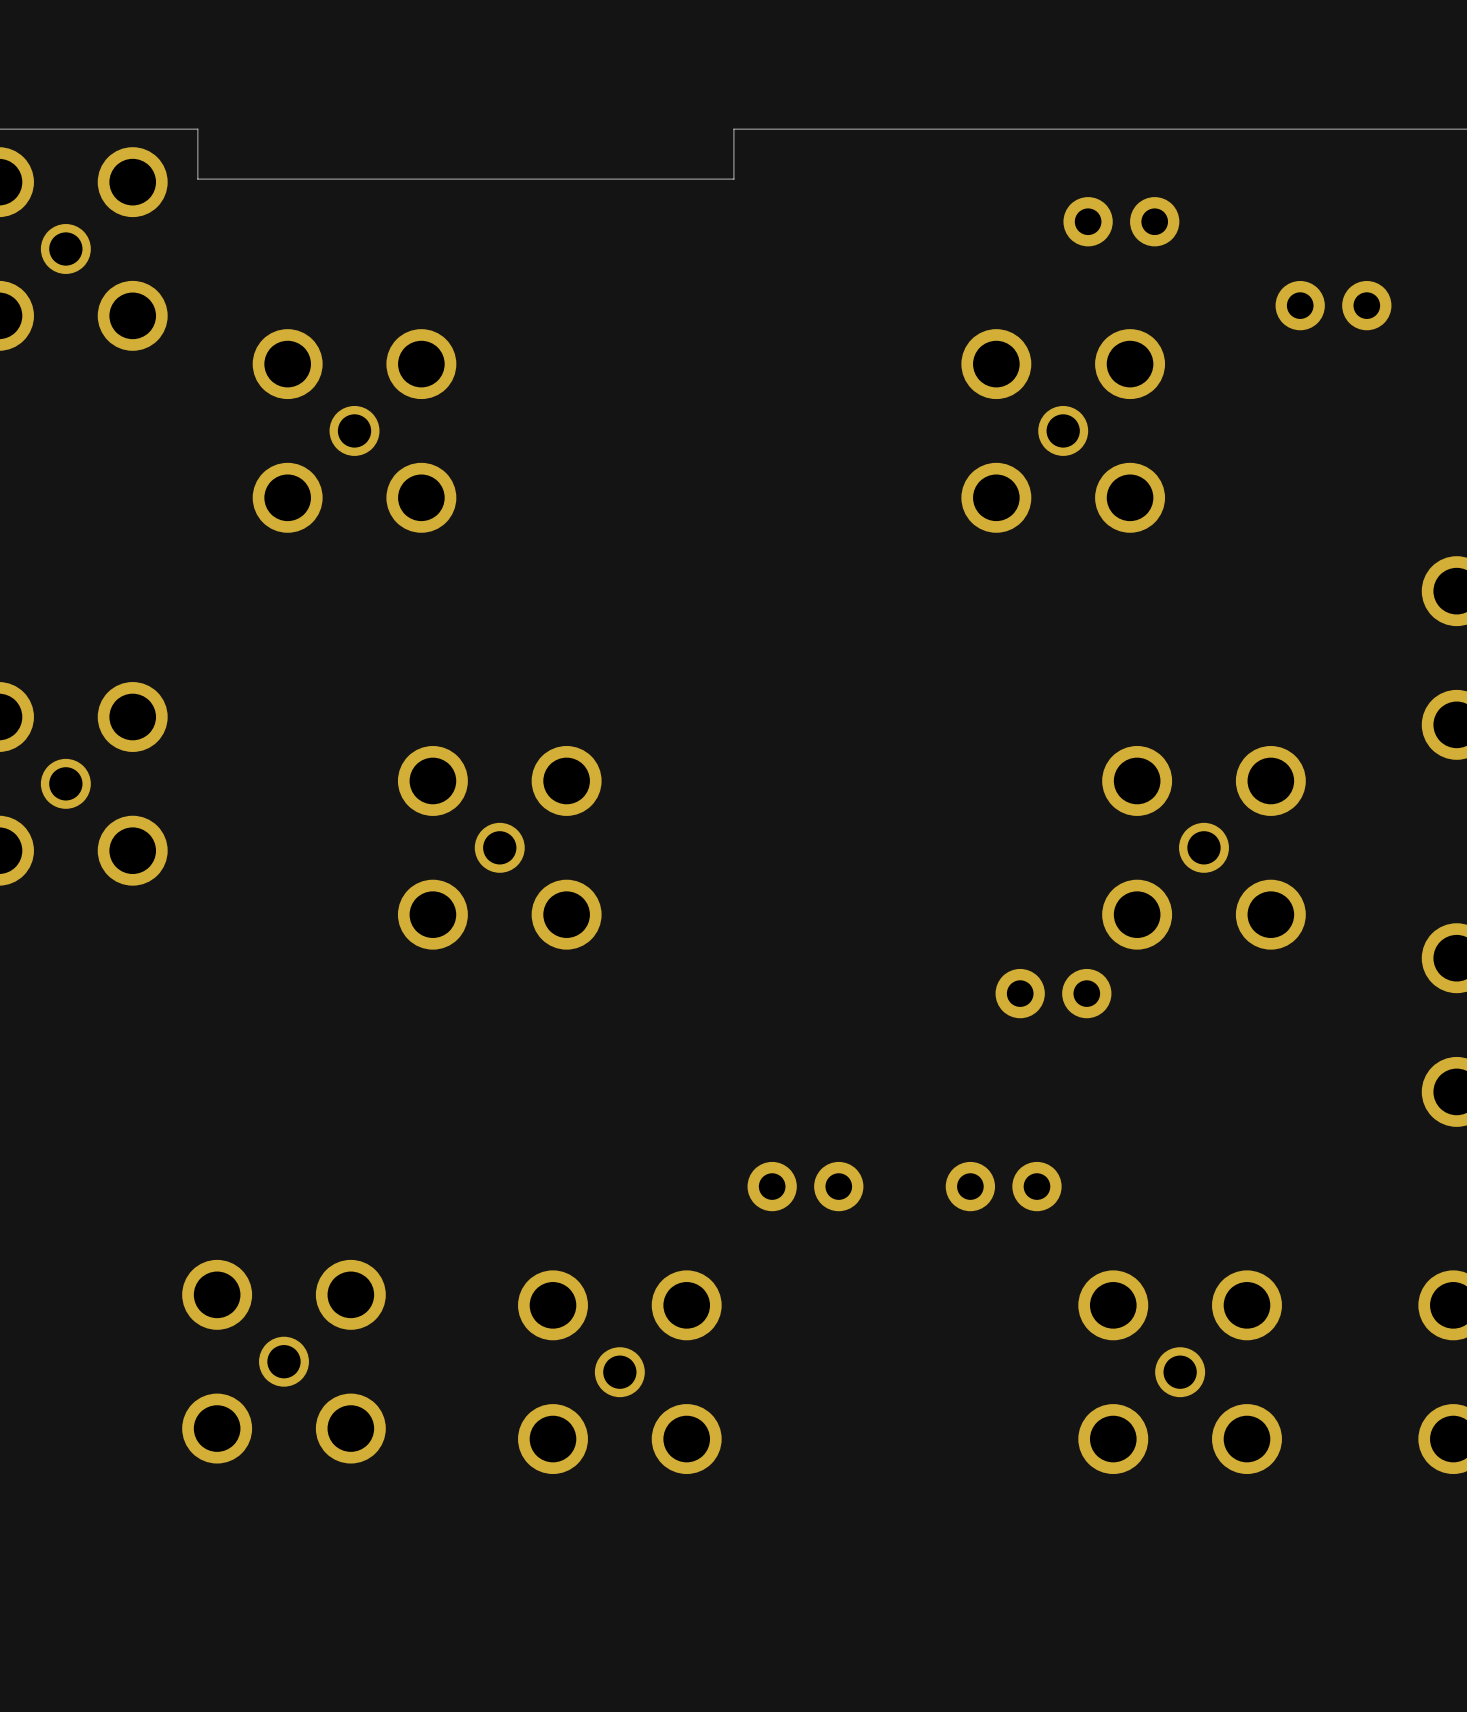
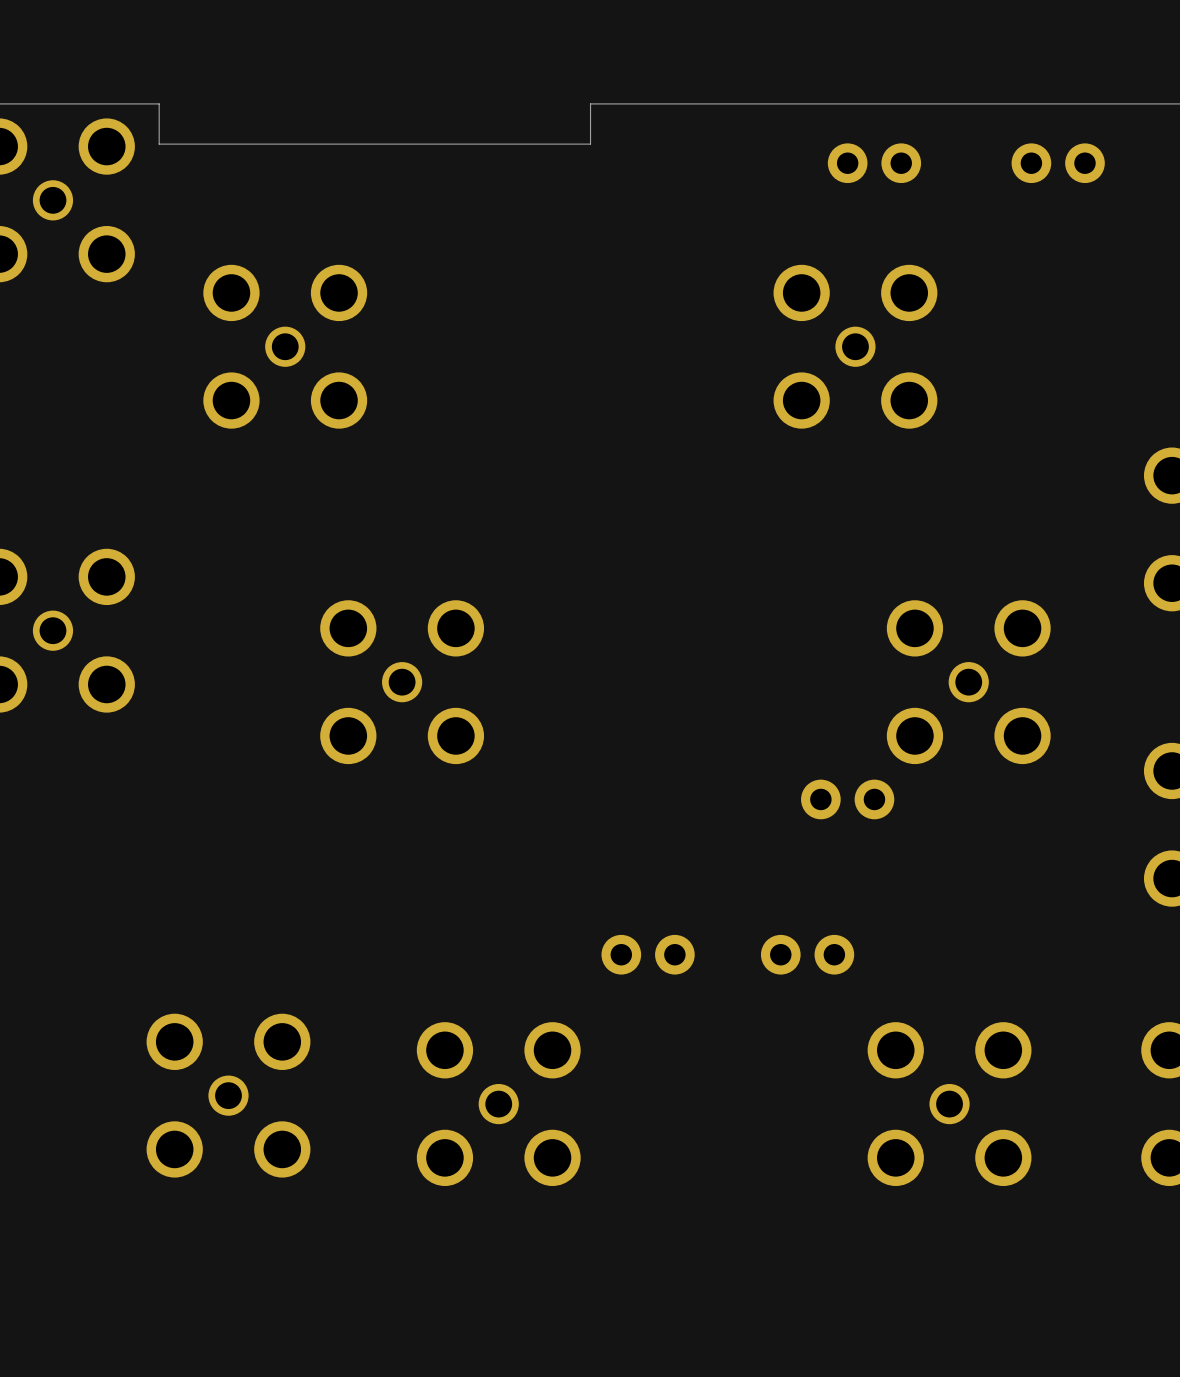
part: none -> (1058, 163)
part position: (1121, 221) -> (874, 163)
part: (1333, 305) -> none

